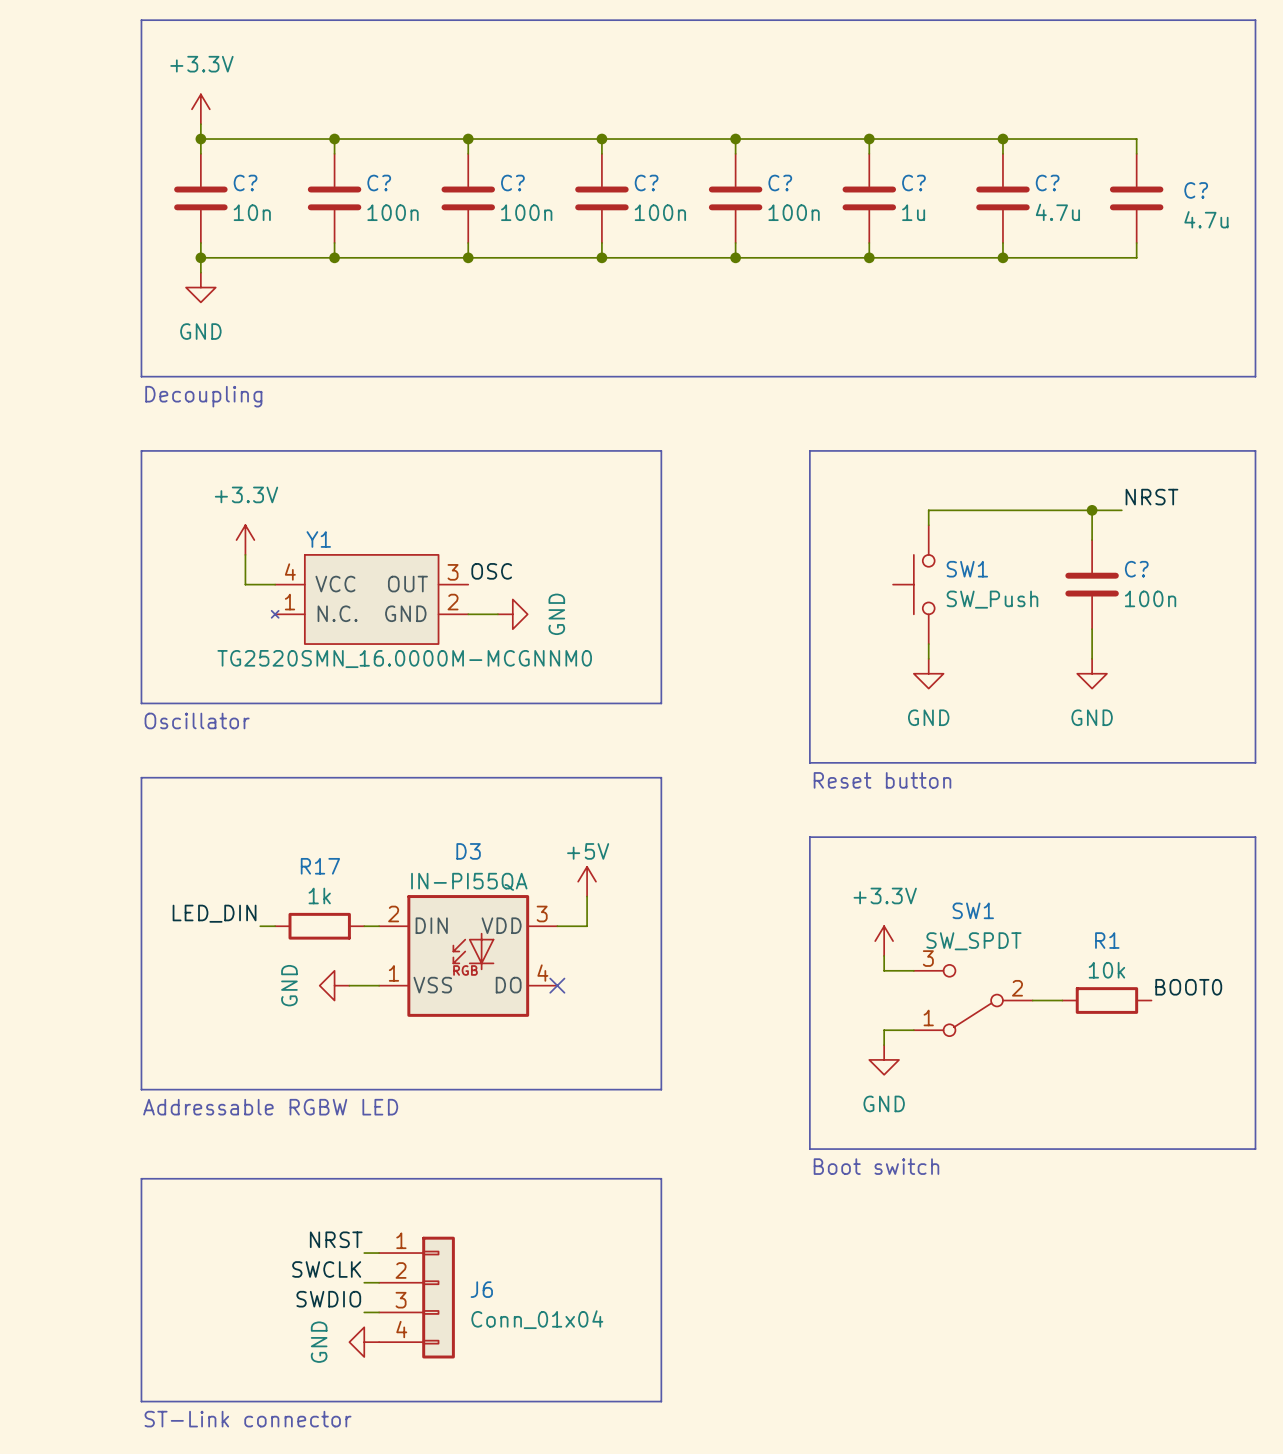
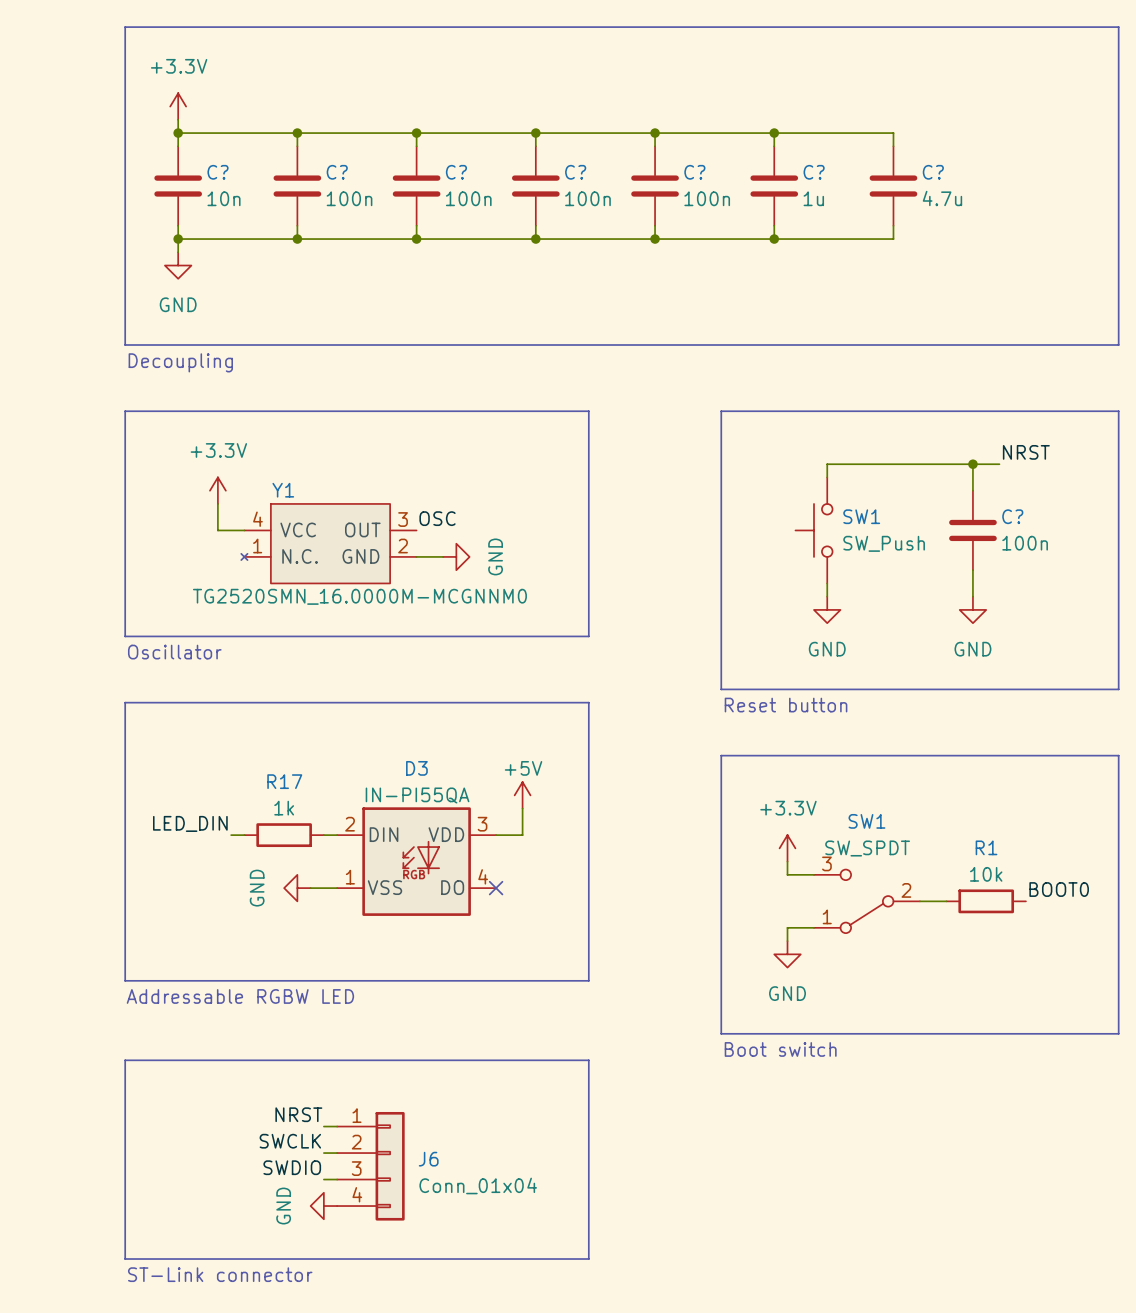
wire: (1002, 139) (1136, 139) (1136, 153) -> none
junction: (1002, 139) -> none
C?: 4.7u (1136, 198) -> none
wire: (1136, 242) (1136, 257) (1002, 257) -> none
junction: (1002, 257) -> none

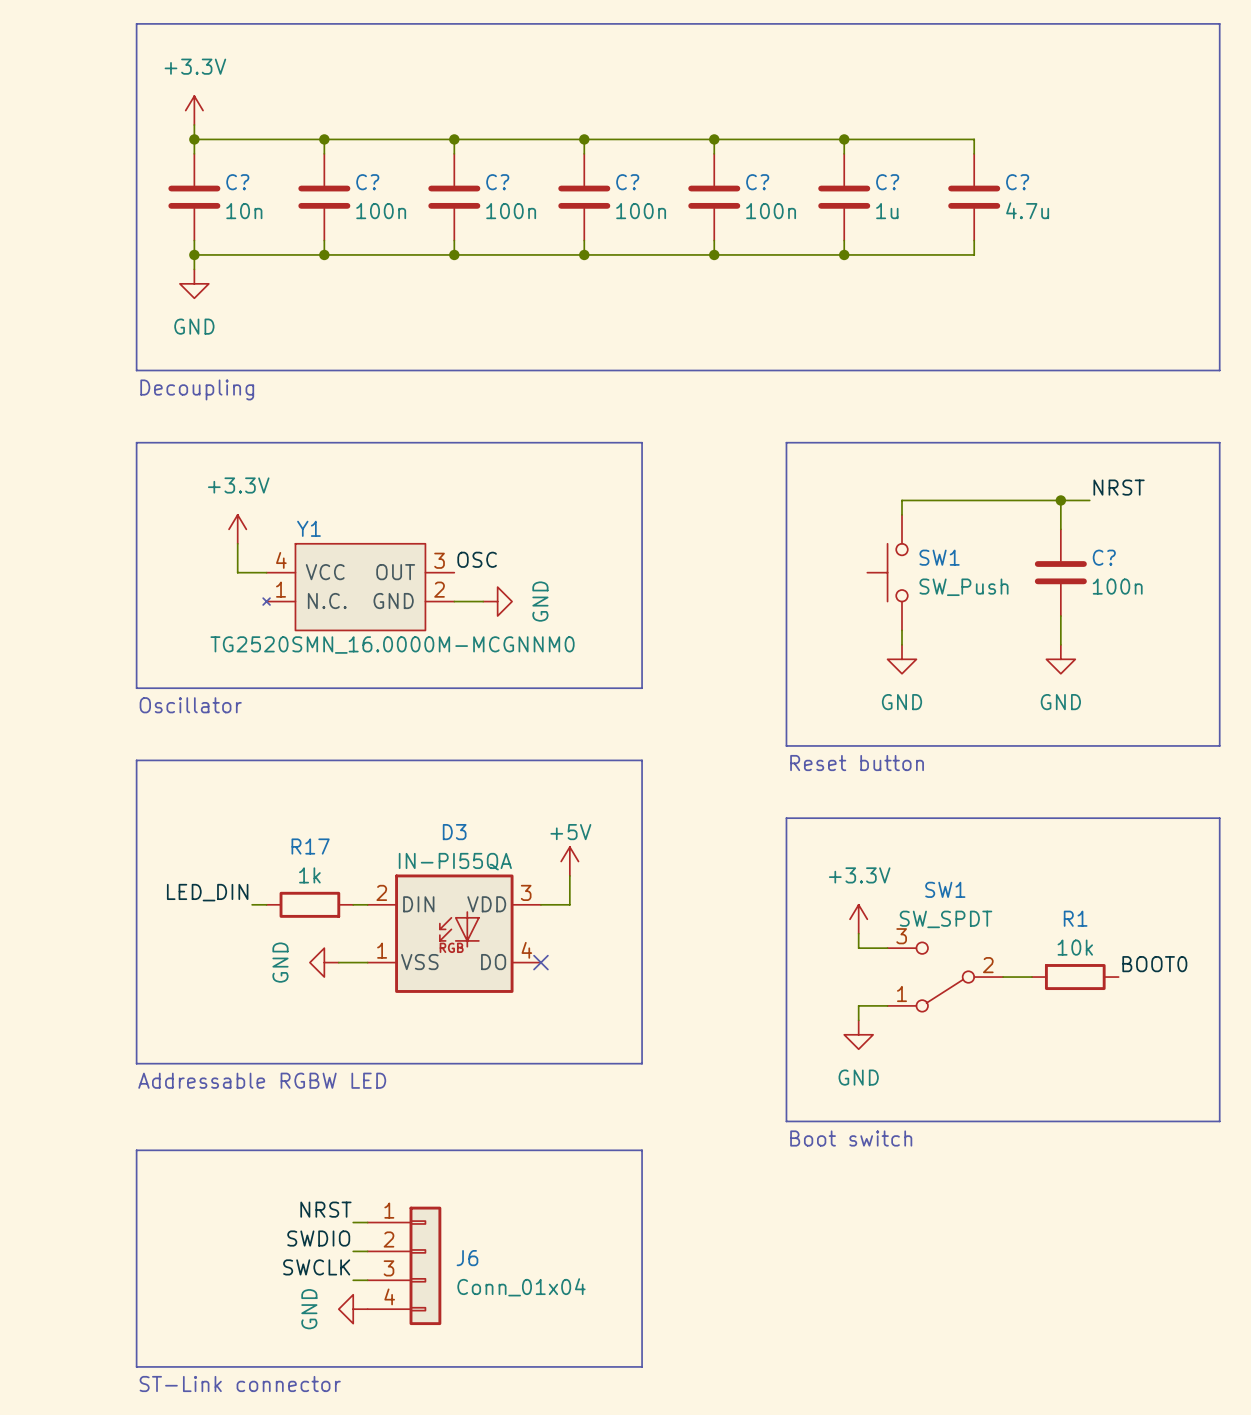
label: SWCLK (290, 1141) -> SWDIO (318, 1238)
label: SWDIO (292, 1167) -> SWCLK (316, 1267)

